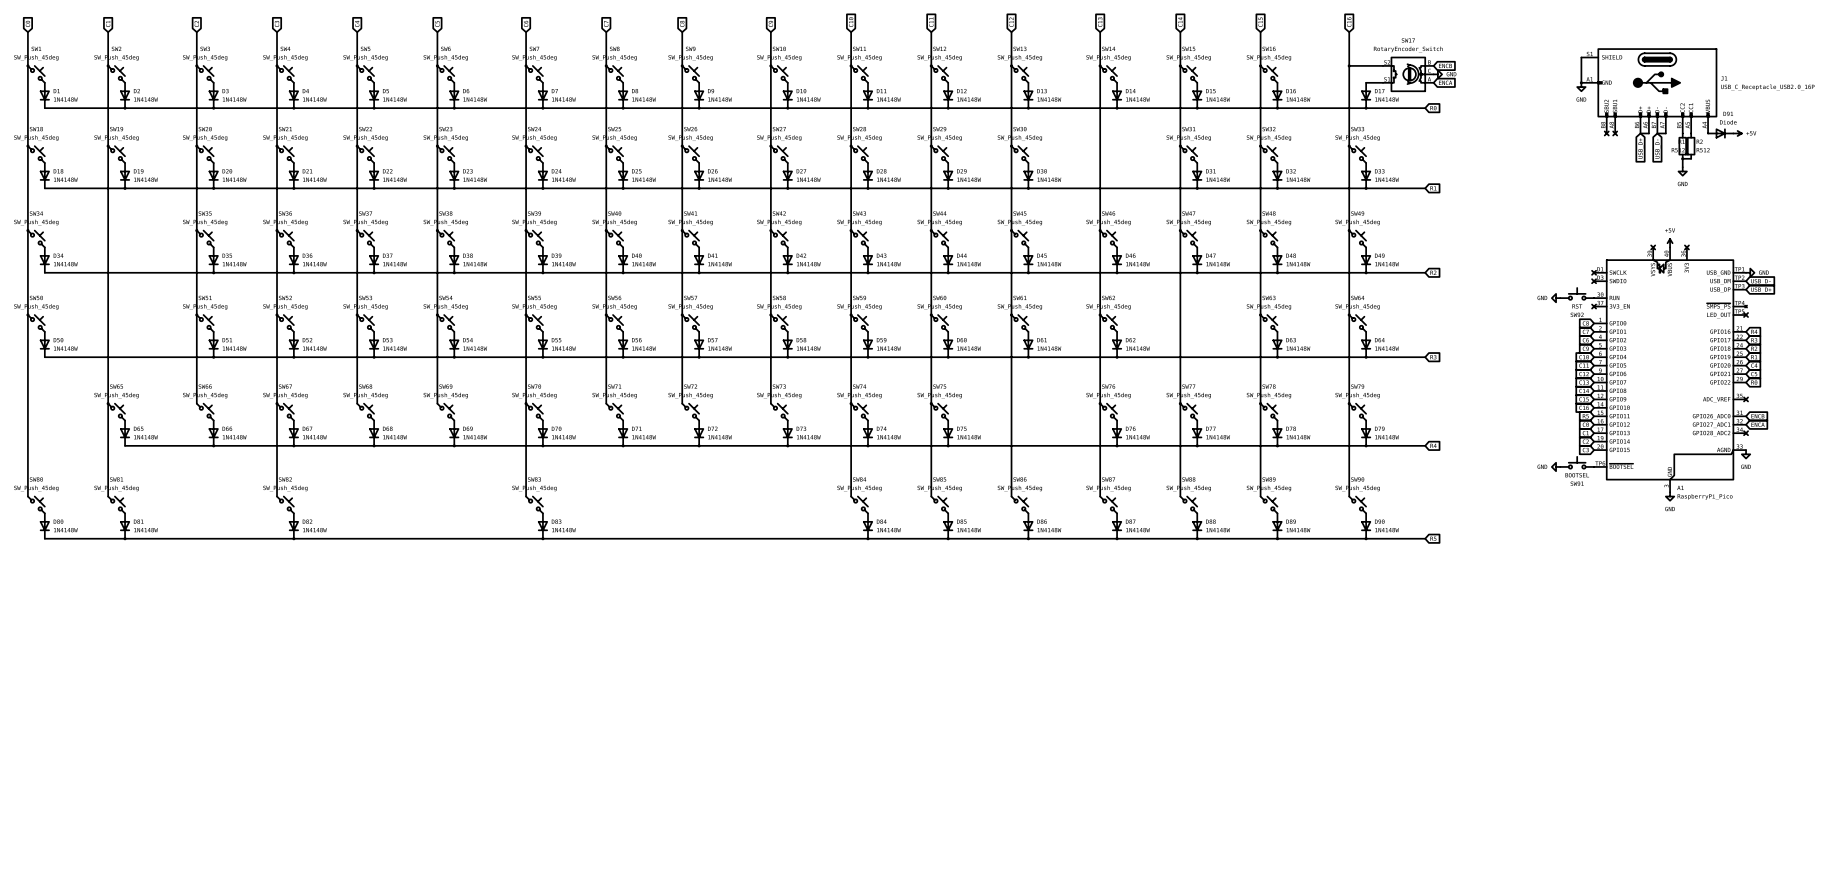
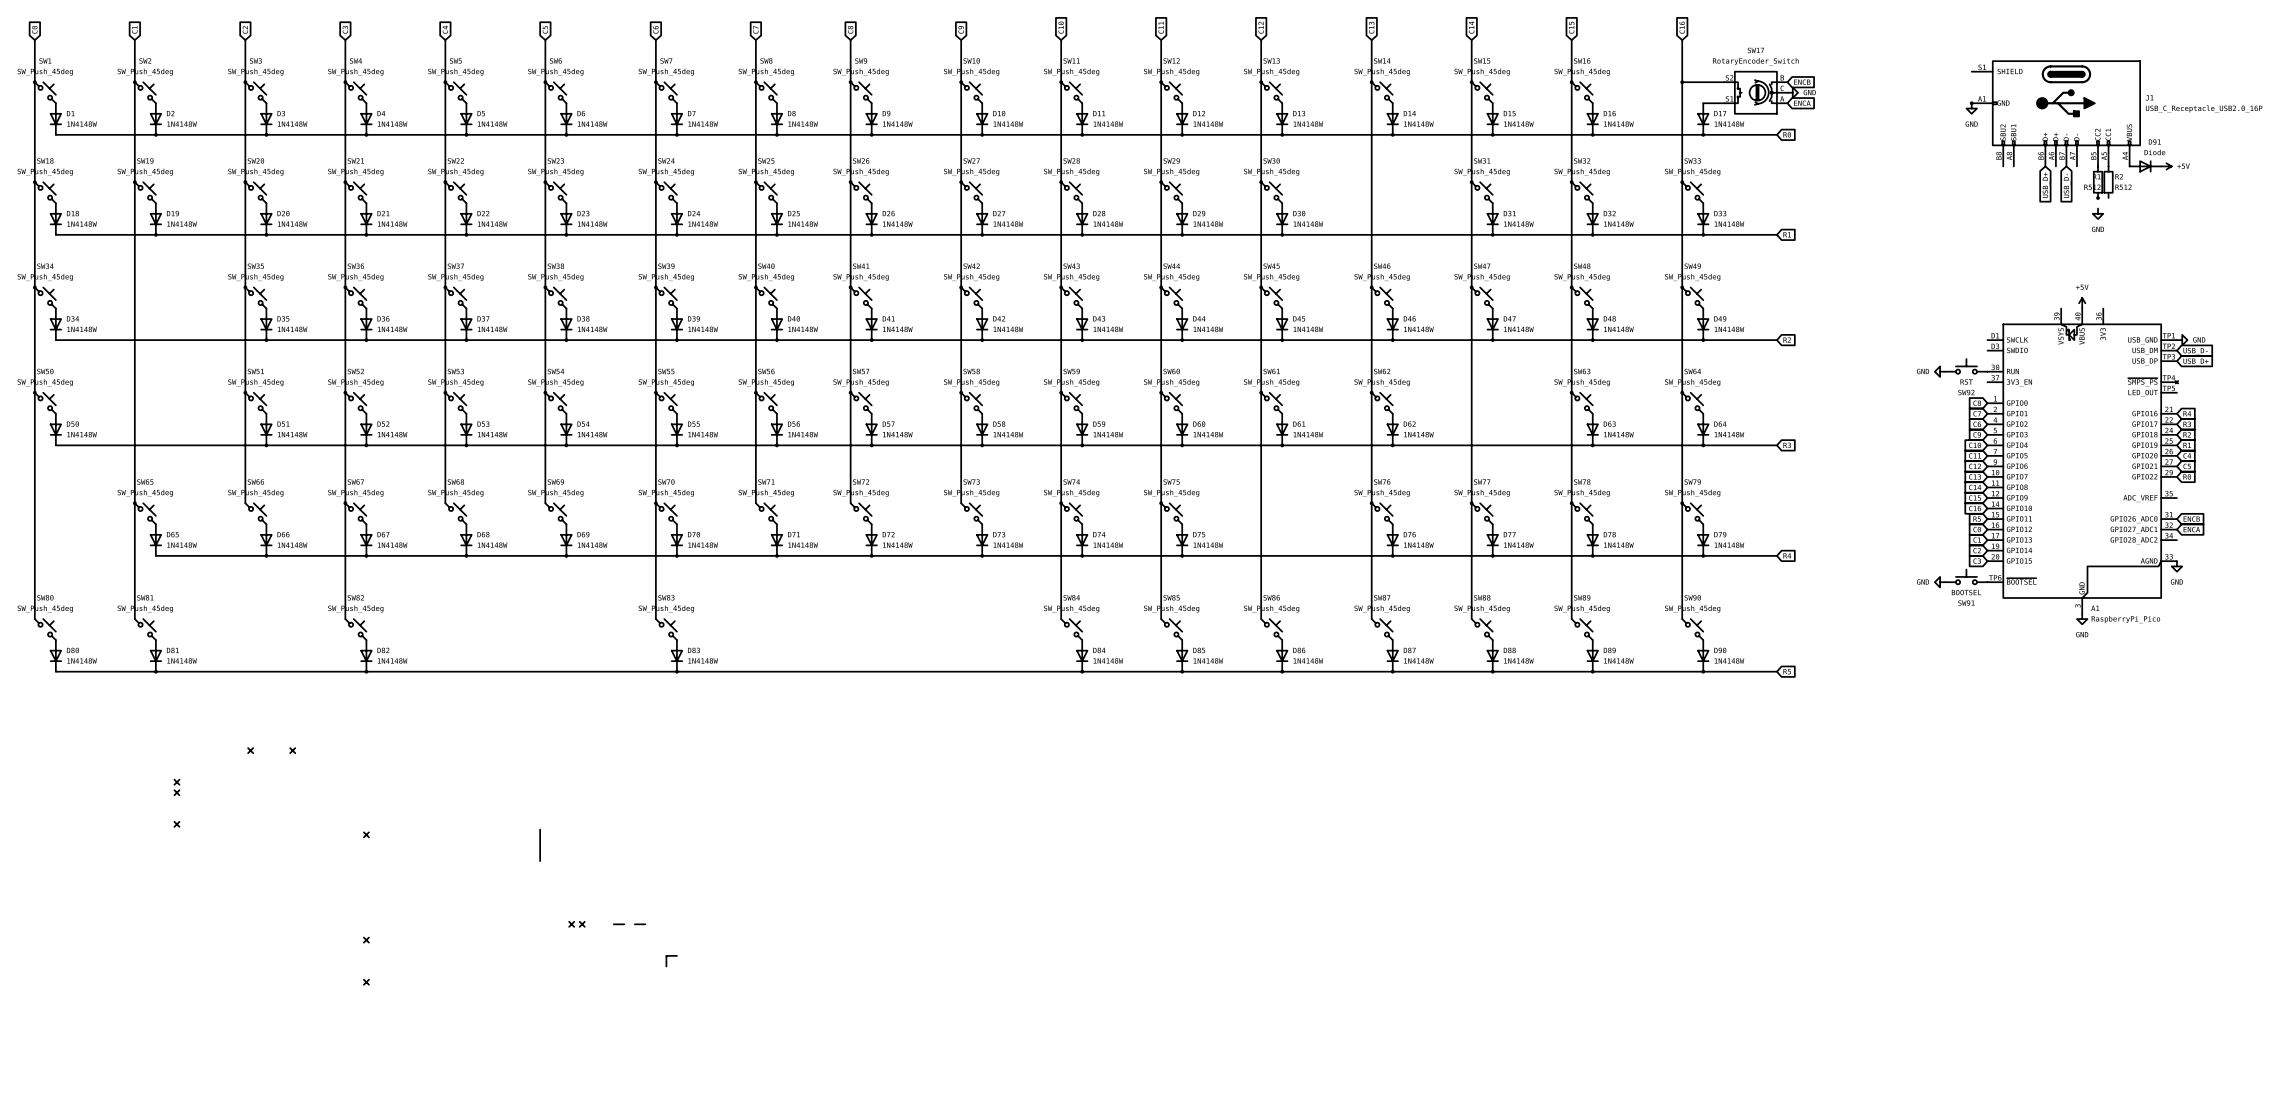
wire: (1581, 57) (1581, 82) -> none
no-connect mark: (1606, 133) -> none
no-connect mark: (1615, 133) -> none
wire: (1640, 133) (1648, 133) -> none
wire: (1657, 133) (1665, 133) -> none
wire: (1691, 158) (1682, 158) (1682, 167) -> none
no-connect mark: (1653, 247) -> none
no-connect mark: (1686, 247) -> none
no-connect mark: (1594, 272) -> none
no-connect mark: (1594, 281) -> none
no-connect mark: (1594, 306) -> none
no-connect mark: (1746, 314) -> none
no-connect mark: (1746, 399) -> none
no-connect mark: (1746, 433) -> none
no-connect mark: none -> (250, 750)
no-connect mark: none -> (292, 750)
no-connect mark: none -> (176, 782)
no-connect mark: none -> (176, 792)
no-connect mark: none -> (176, 824)
wire: none -> (540, 829) (540, 861)
no-connect mark: none -> (366, 834)
no-connect mark: none -> (571, 924)
no-connect mark: none -> (582, 924)
wire: none -> (613, 924) (624, 924)
wire: none -> (634, 924) (645, 924)
no-connect mark: none -> (366, 940)
wire: none -> (676, 955) (666, 955) (666, 966)
no-connect mark: none -> (366, 982)

